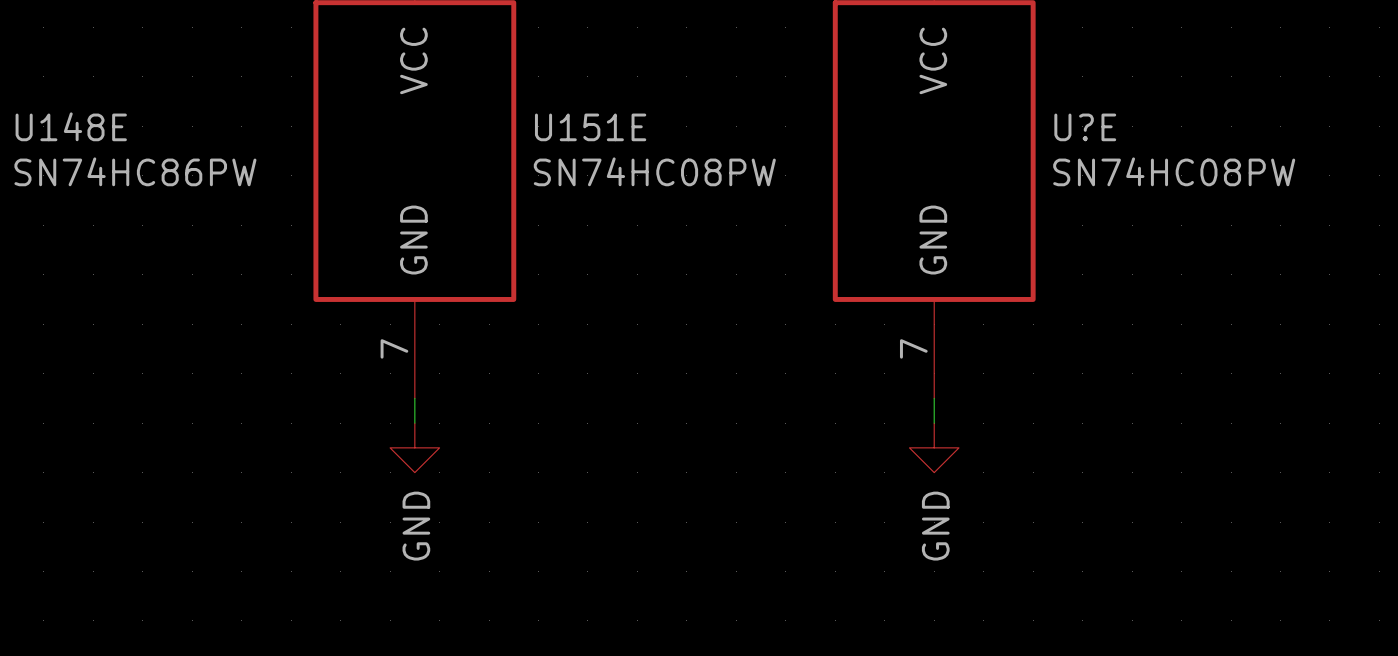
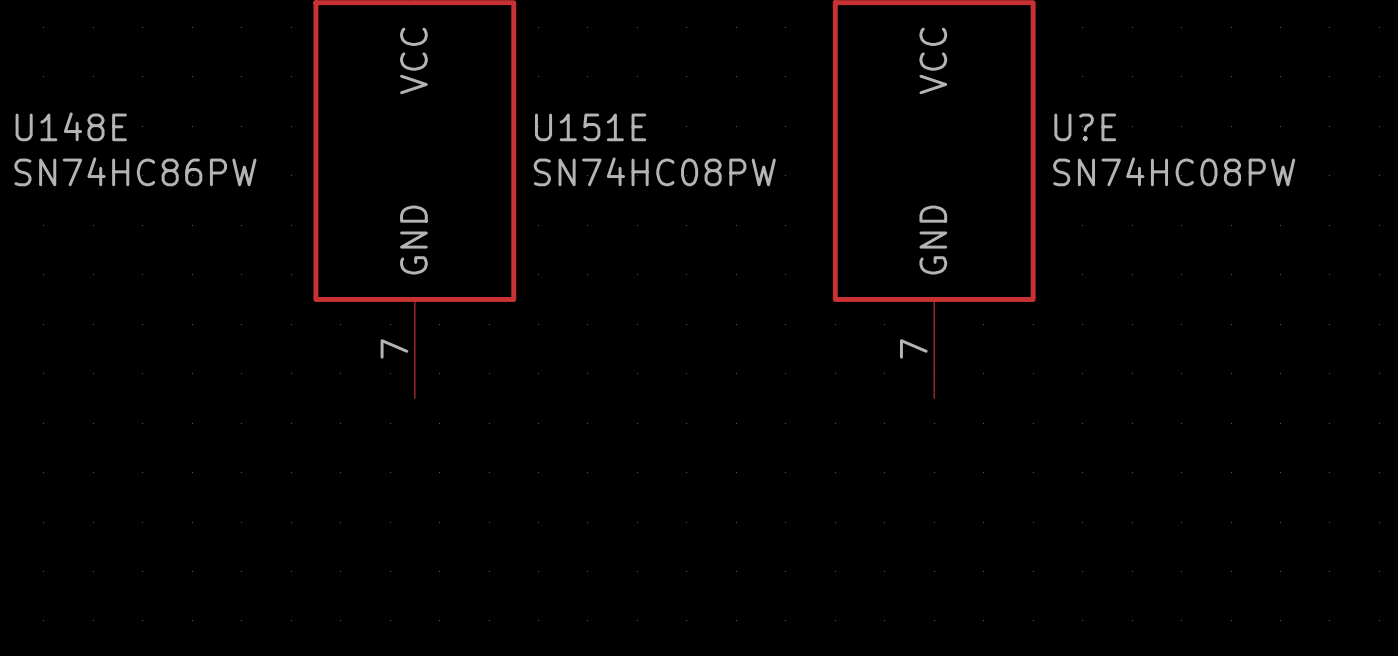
wire: (414, 398) (414, 423) -> none
wire: (934, 398) (934, 423) -> none
power symbol: GND (414, 447) -> none
power symbol: GND (934, 447) -> none

